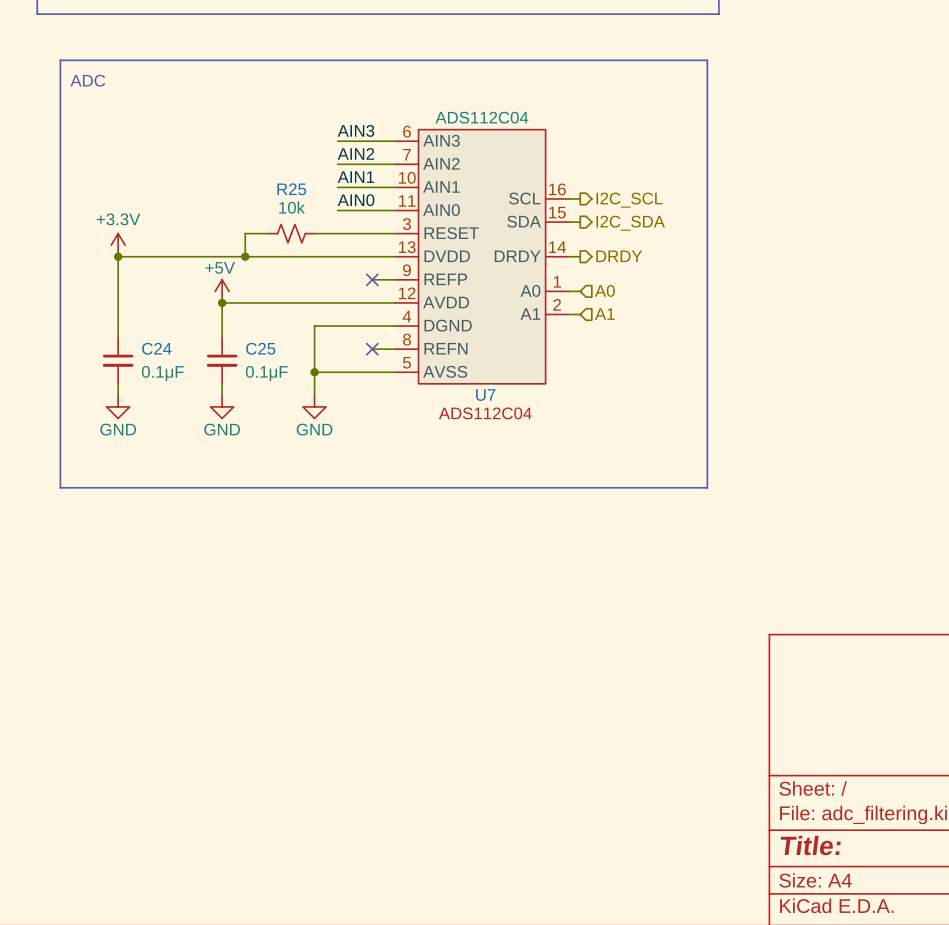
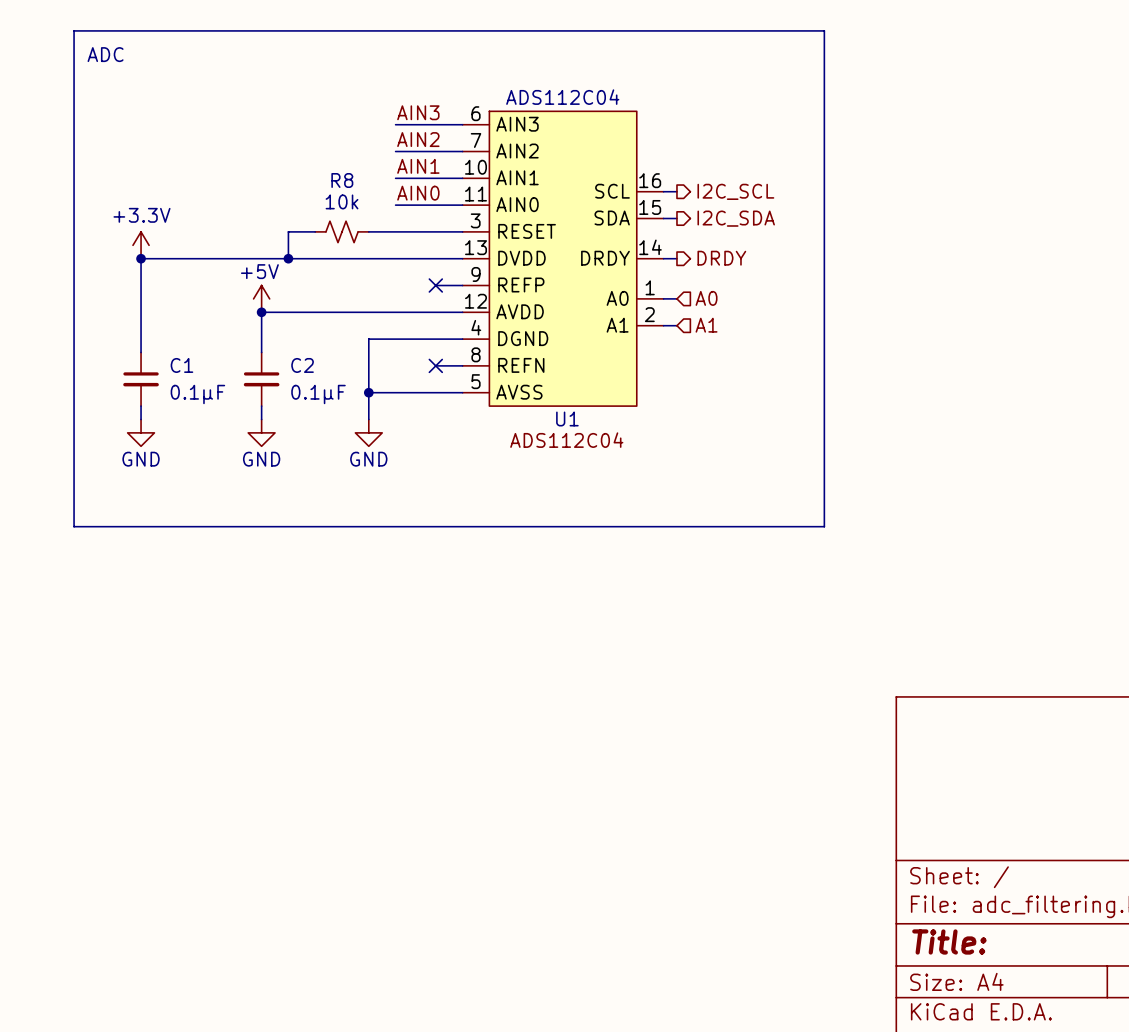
R25 name: R25 (291, 189) -> R8 (342, 180)
C24 name: C24 (156, 348) -> C1 (181, 365)
C25 name: C25 (260, 348) -> C2 (302, 365)
U7 name: U7 (485, 395) -> U1 (567, 418)

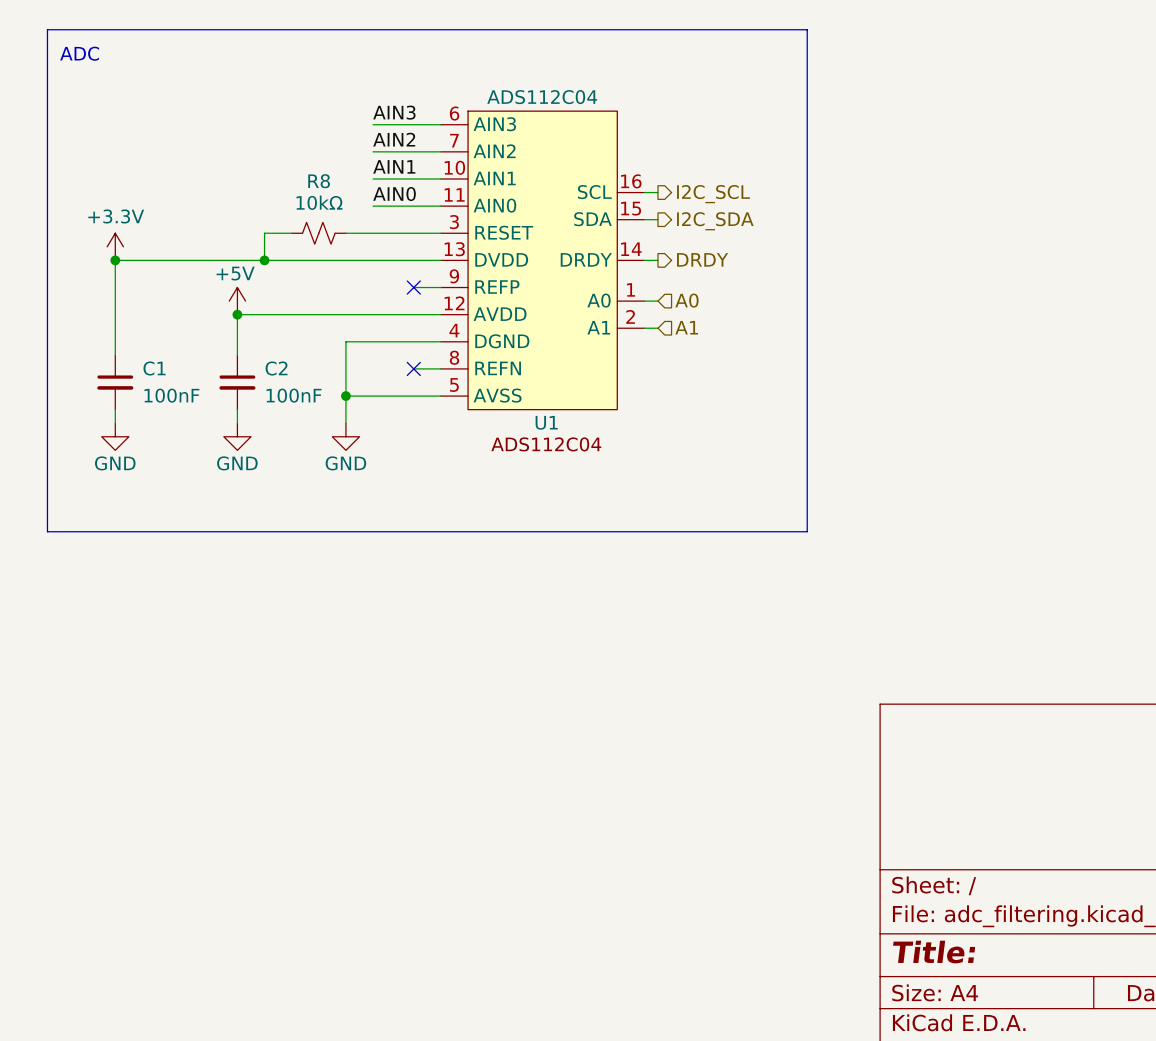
R8 value: 10k (342, 201) -> 10kΩ (319, 202)
C1 value: 0.1μF (197, 394) -> 100nF (171, 395)
C2 value: 0.1μF (318, 394) -> 100nF (294, 395)

